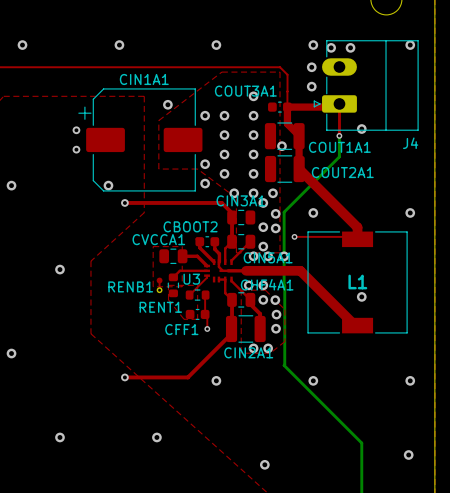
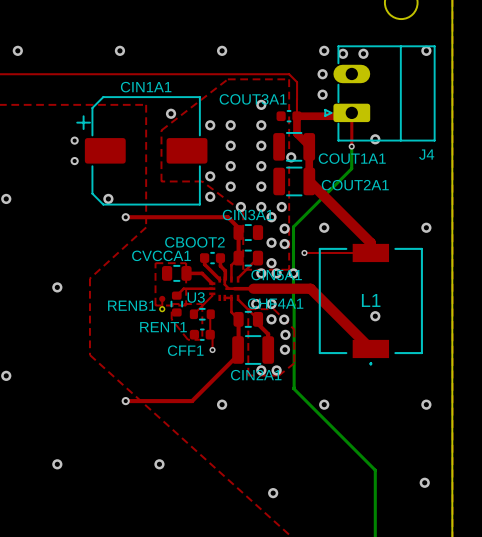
L1 footprint: [307, 231, 408, 334] -> [318, 243, 423, 366]

